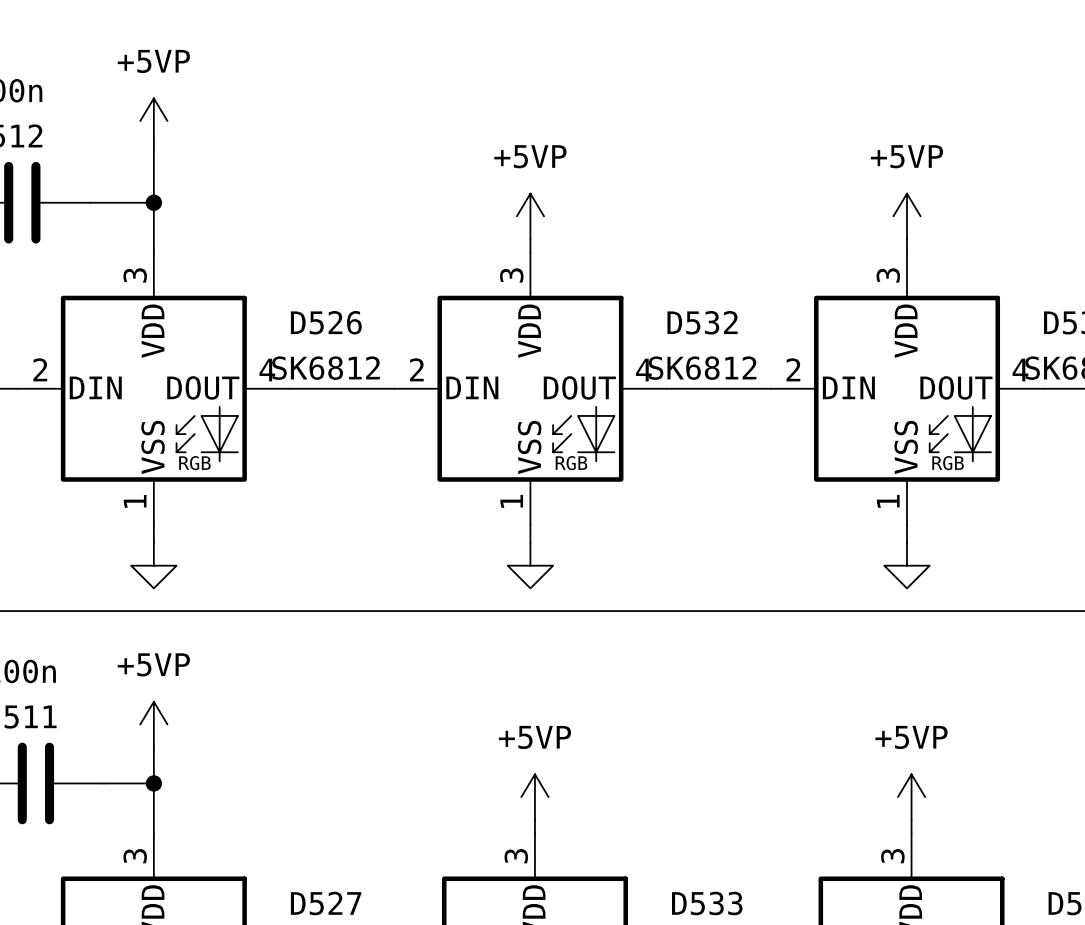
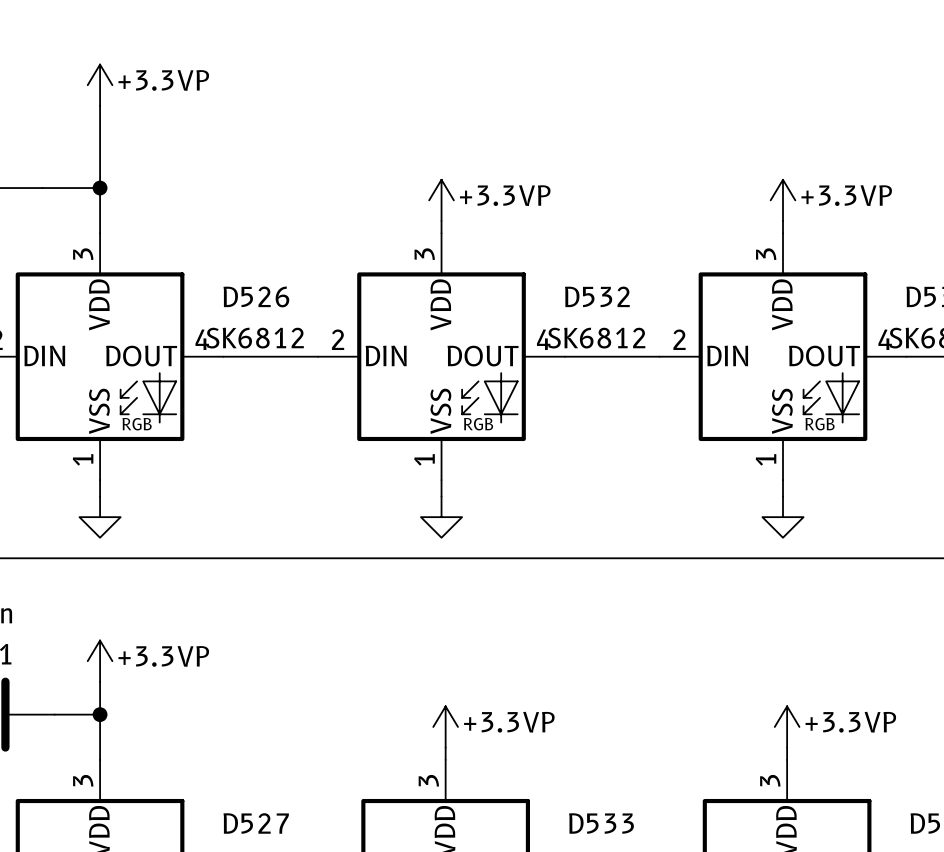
power symbol: none -> +3.3VP (100, 85)
power symbol: +5VP (153, 121) -> none
power symbol: +5VP (530, 216) -> +3.3VP (441, 200)
power symbol: +5VP (907, 216) -> +3.3VP (782, 200)
power symbol: +5VP (153, 724) -> +3.3VP (100, 661)
power symbol: +5VP (534, 797) -> +3.3VP (445, 726)
power symbol: +5VP (911, 797) -> +3.3VP (787, 726)

